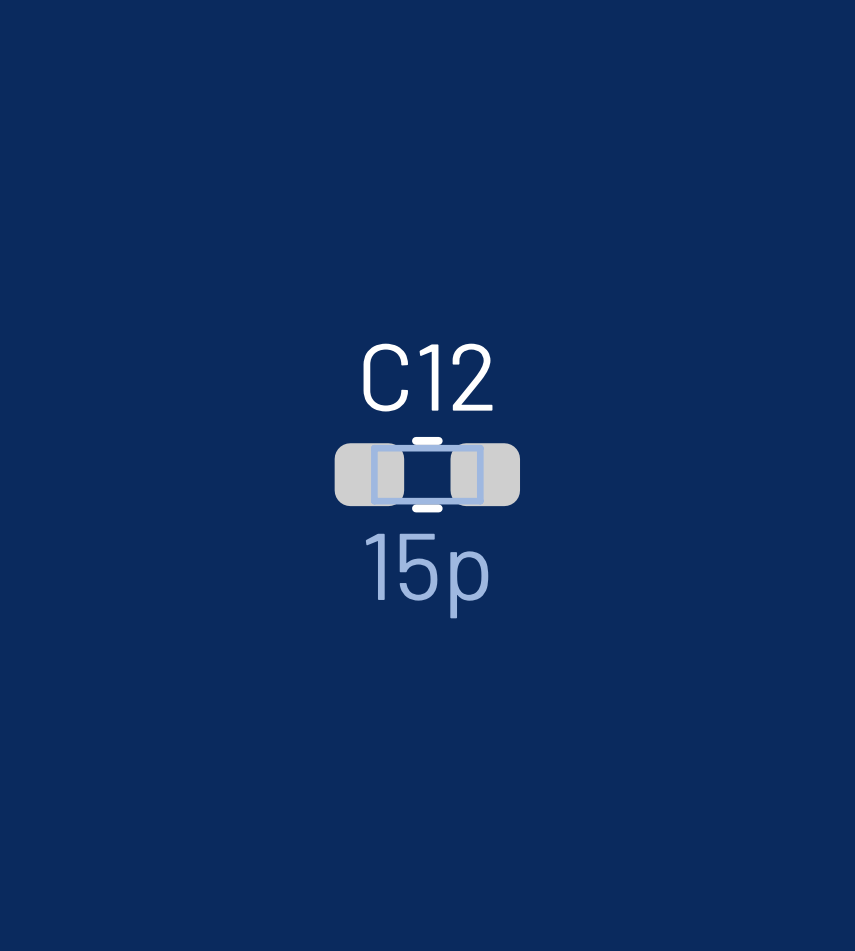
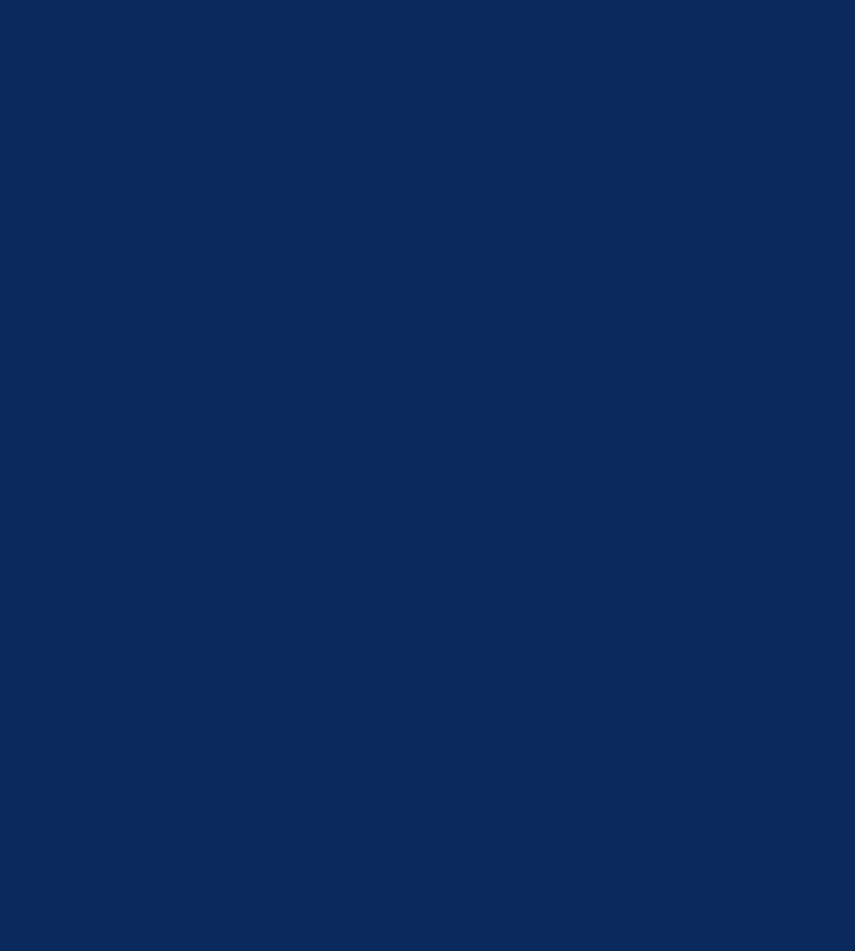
C12: 15p (427, 474) -> none

